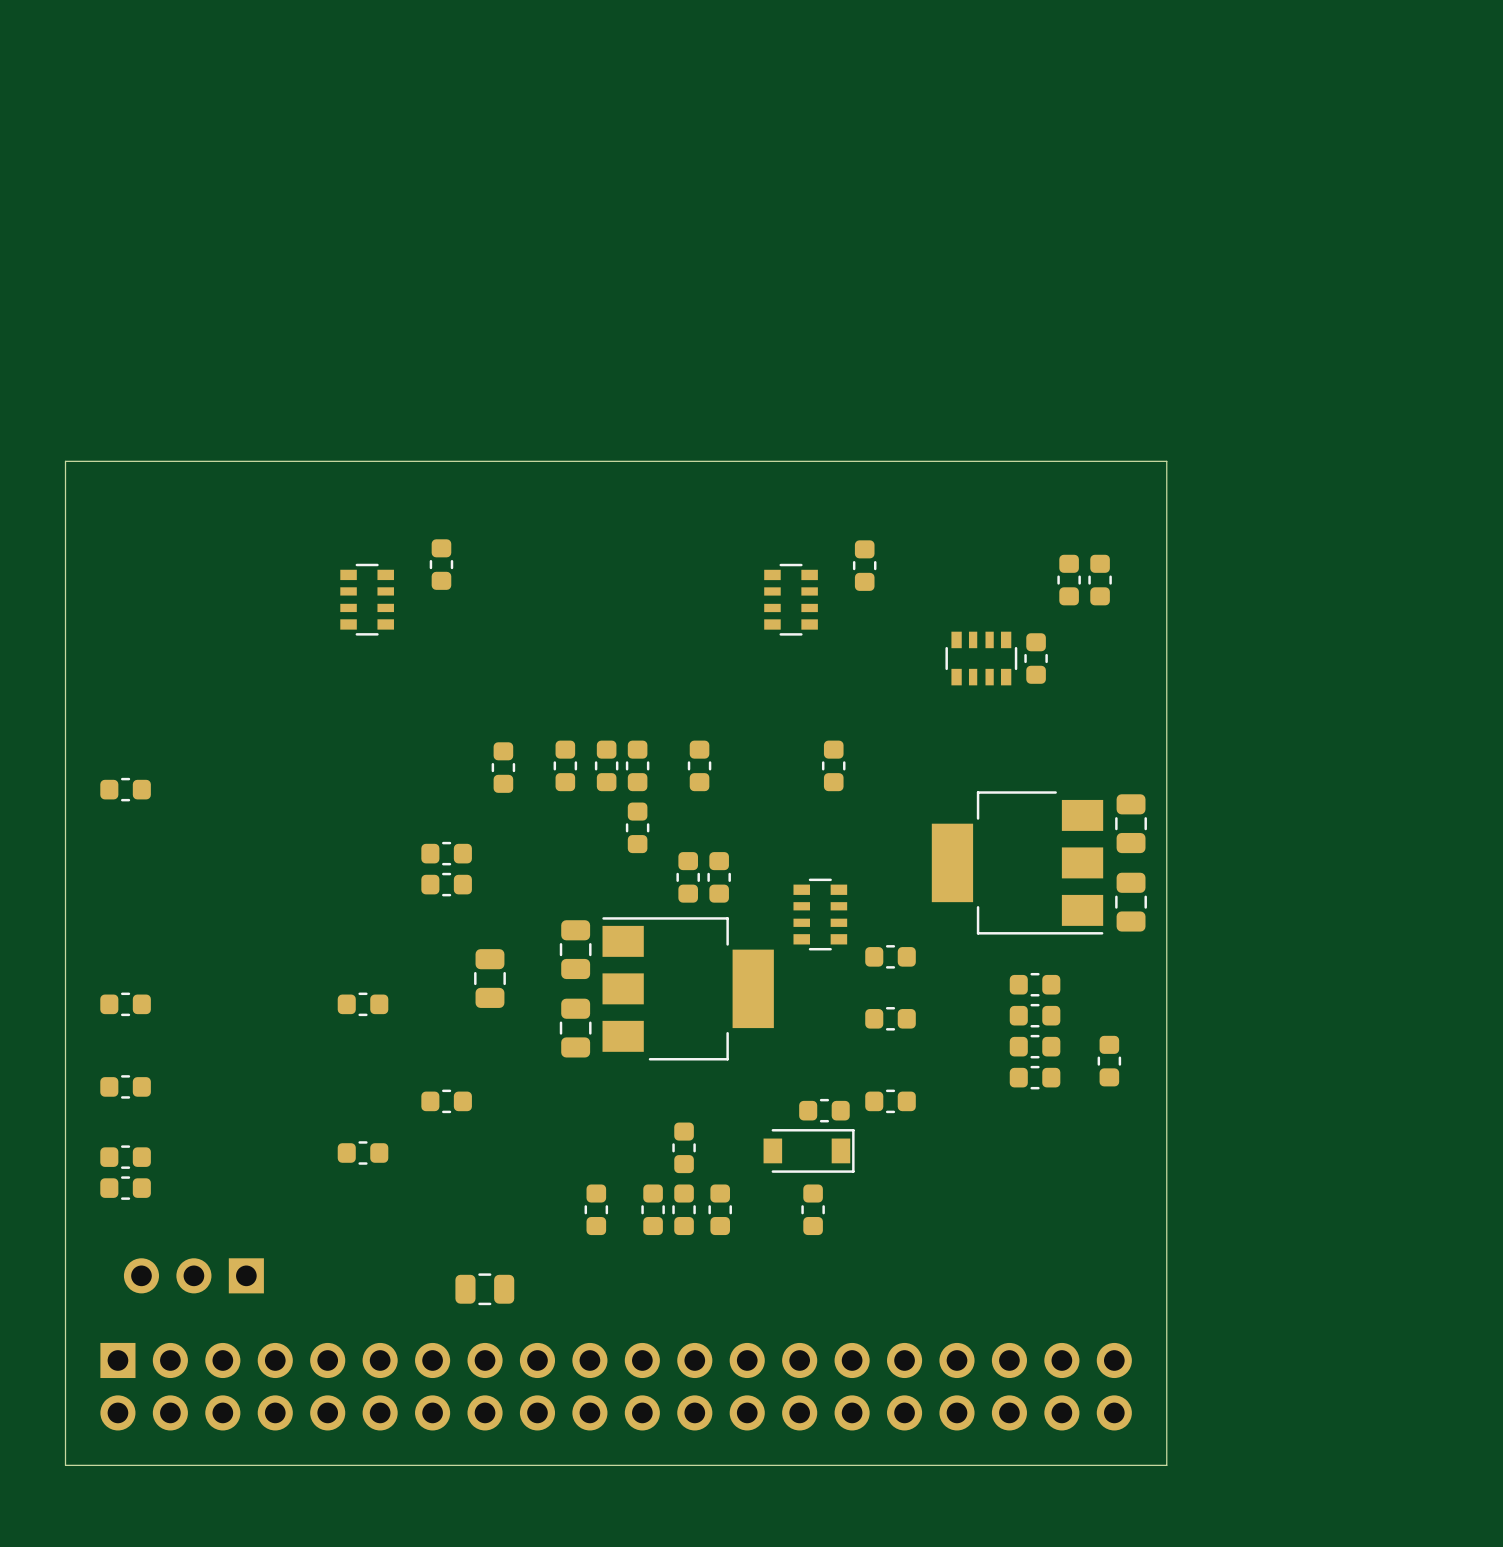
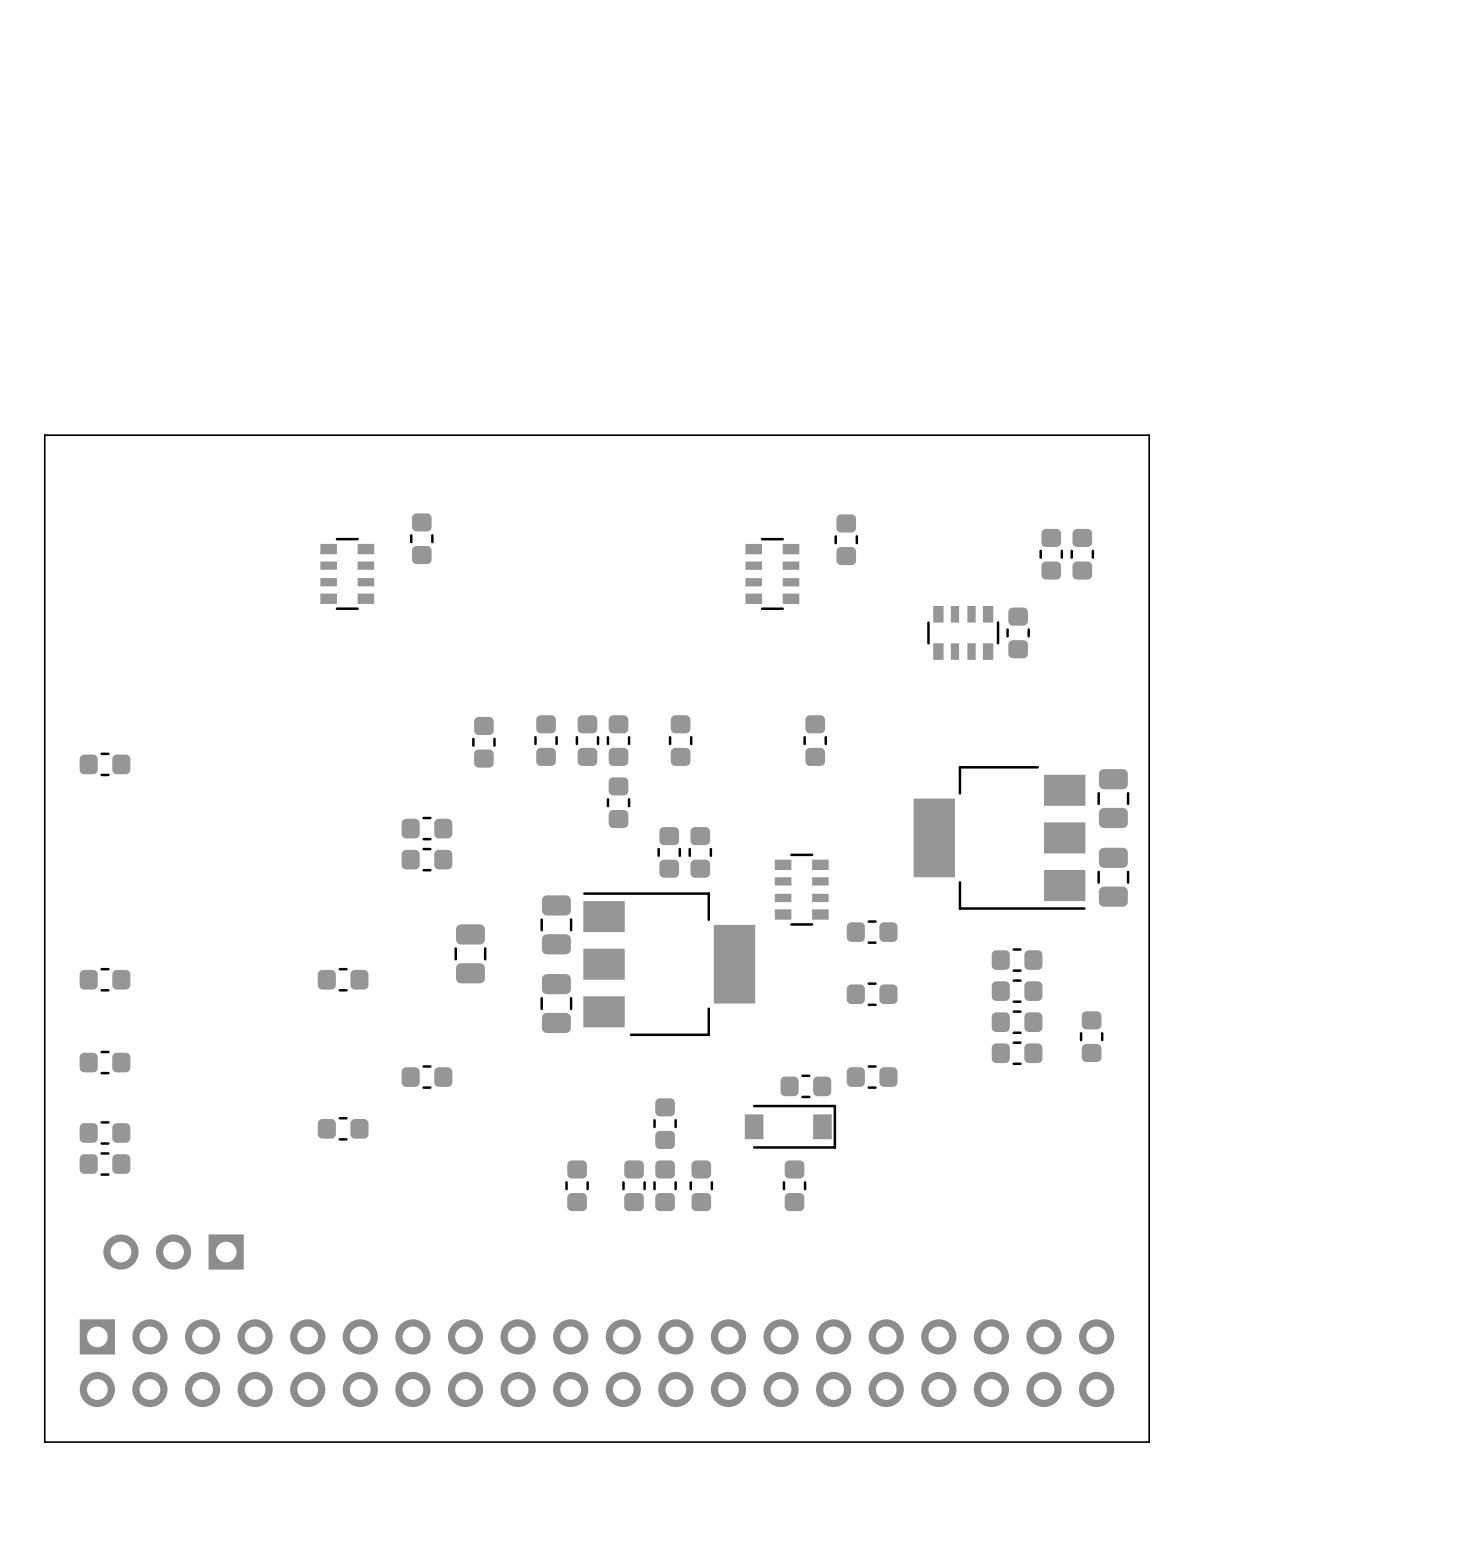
part: (484, 1289) -> none

